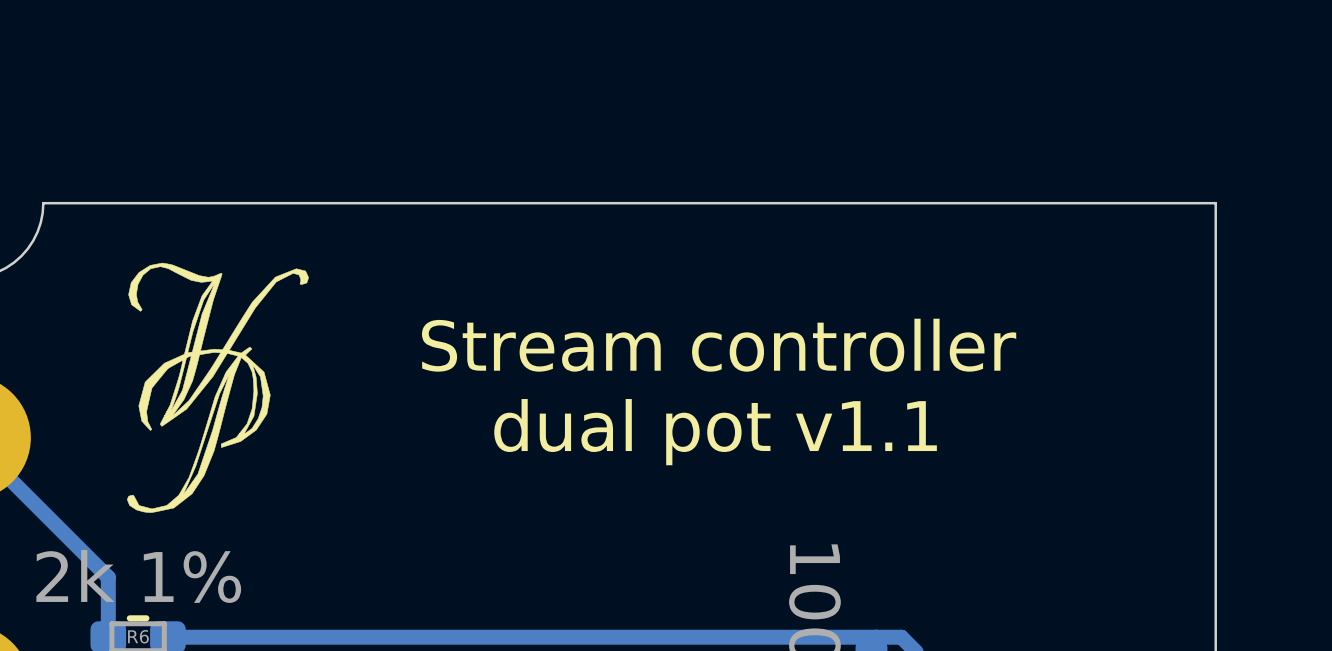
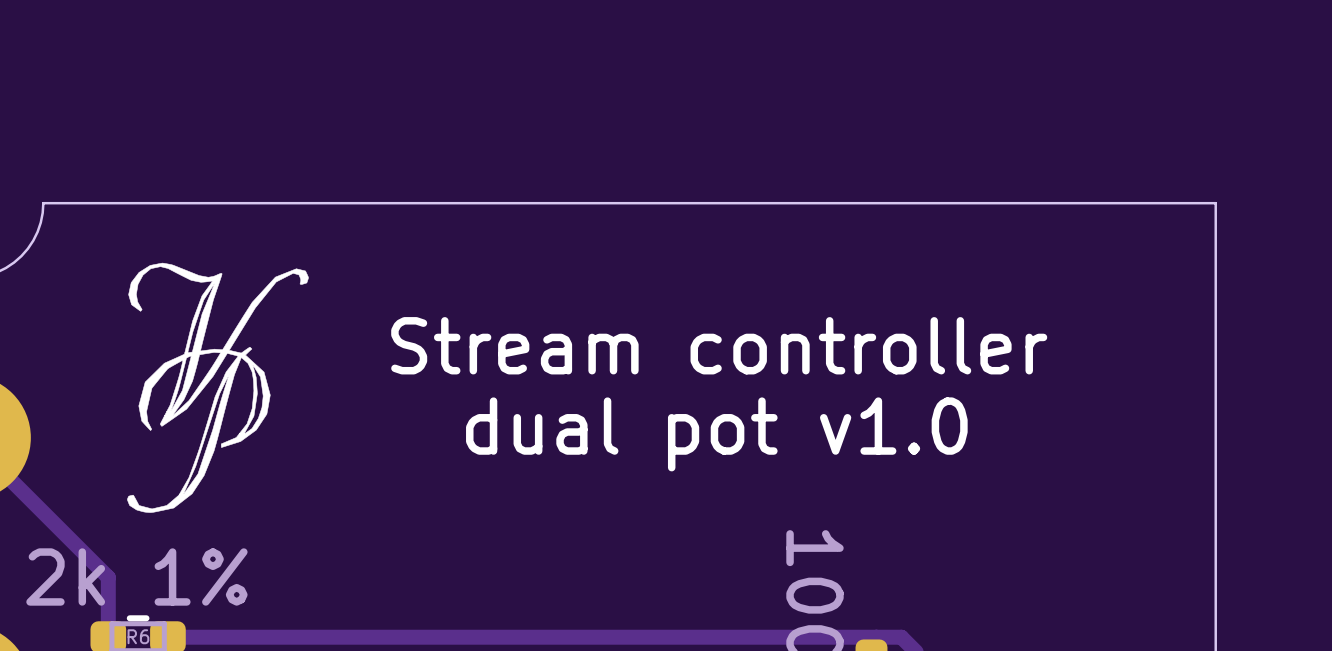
text: dual pot v1.1 (715, 432) -> dual pot v1.0 (716, 434)

